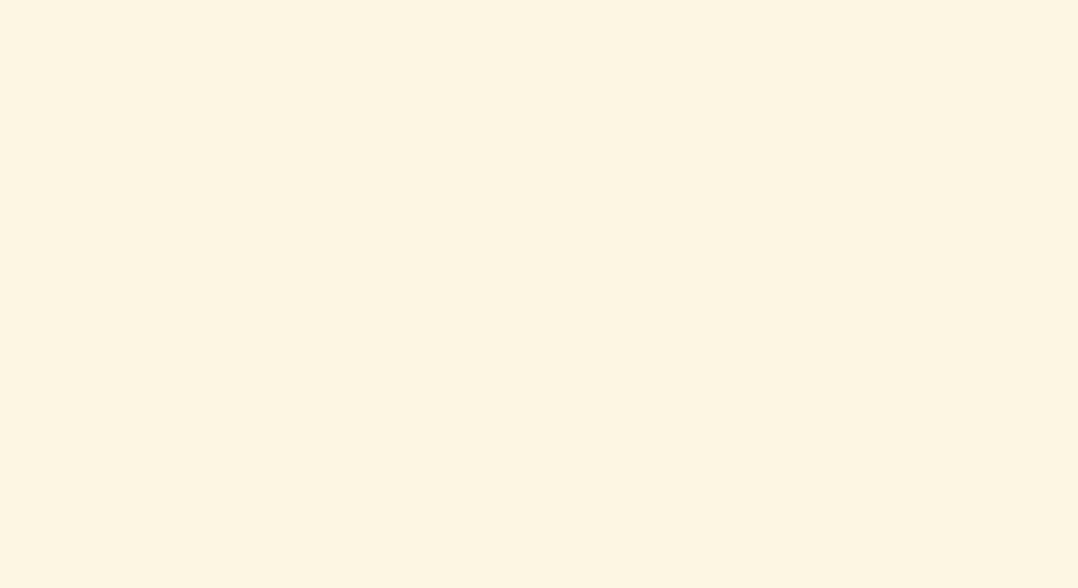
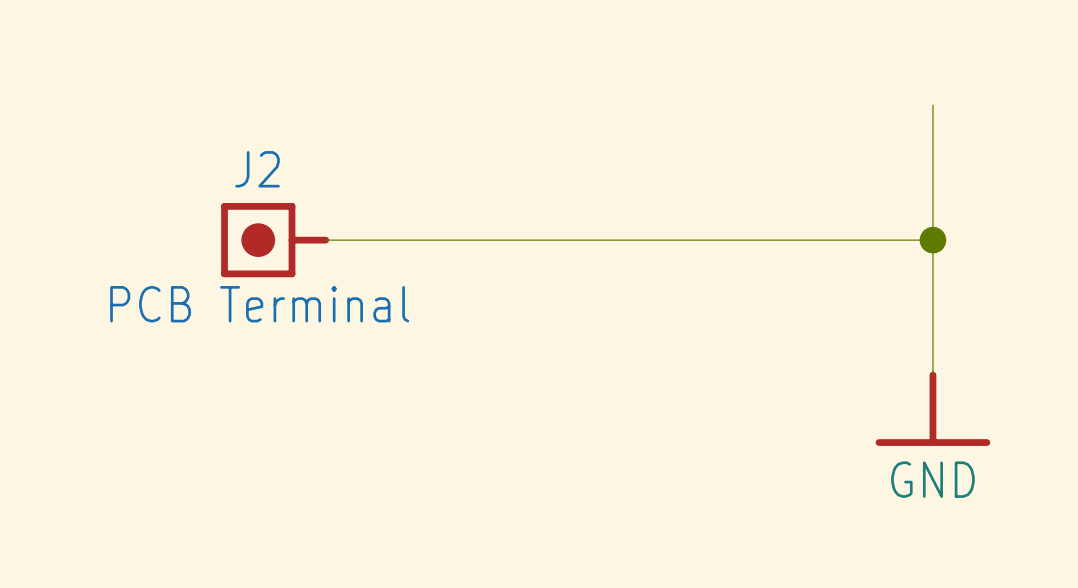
wire: none -> (932, 105) (932, 375)
J2: none -> PCB Terminal (275, 240)
wire: none -> (325, 240) (932, 240)
junction: none -> (932, 240)
power symbol: none -> GND (932, 408)

